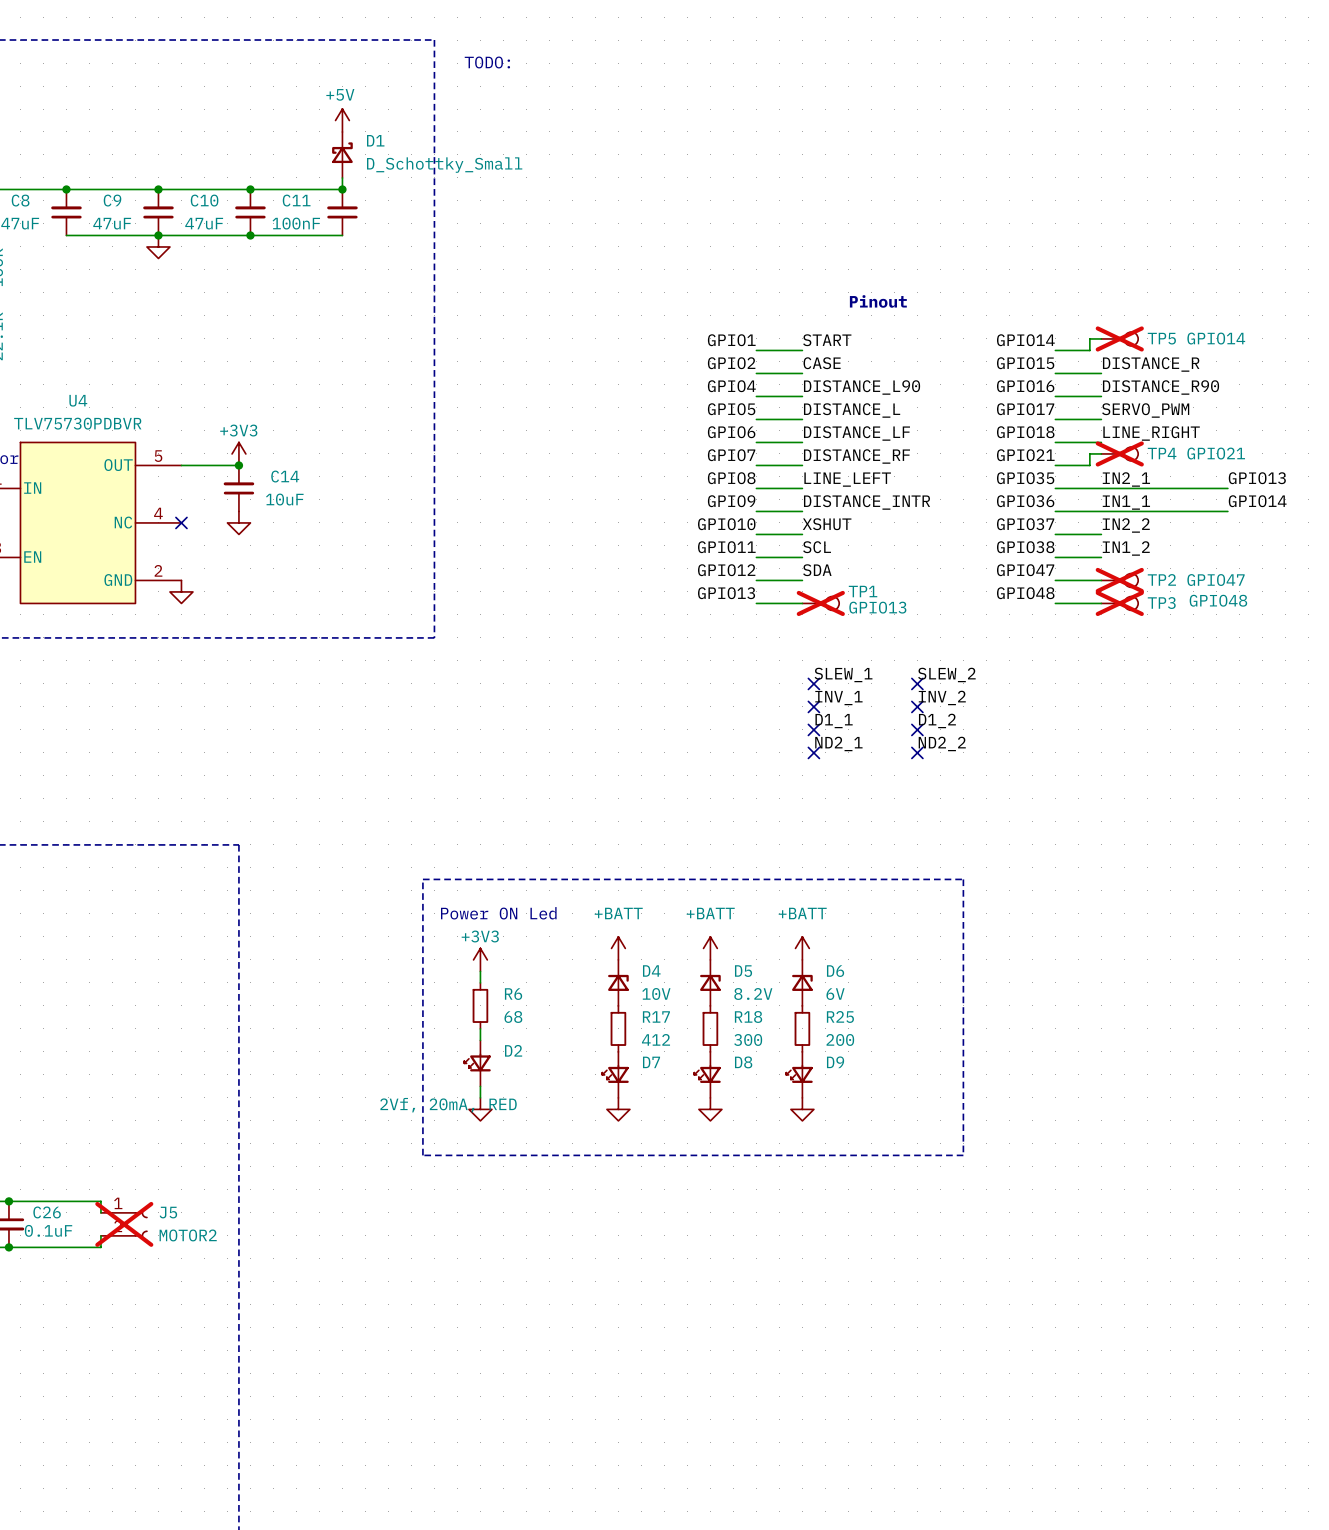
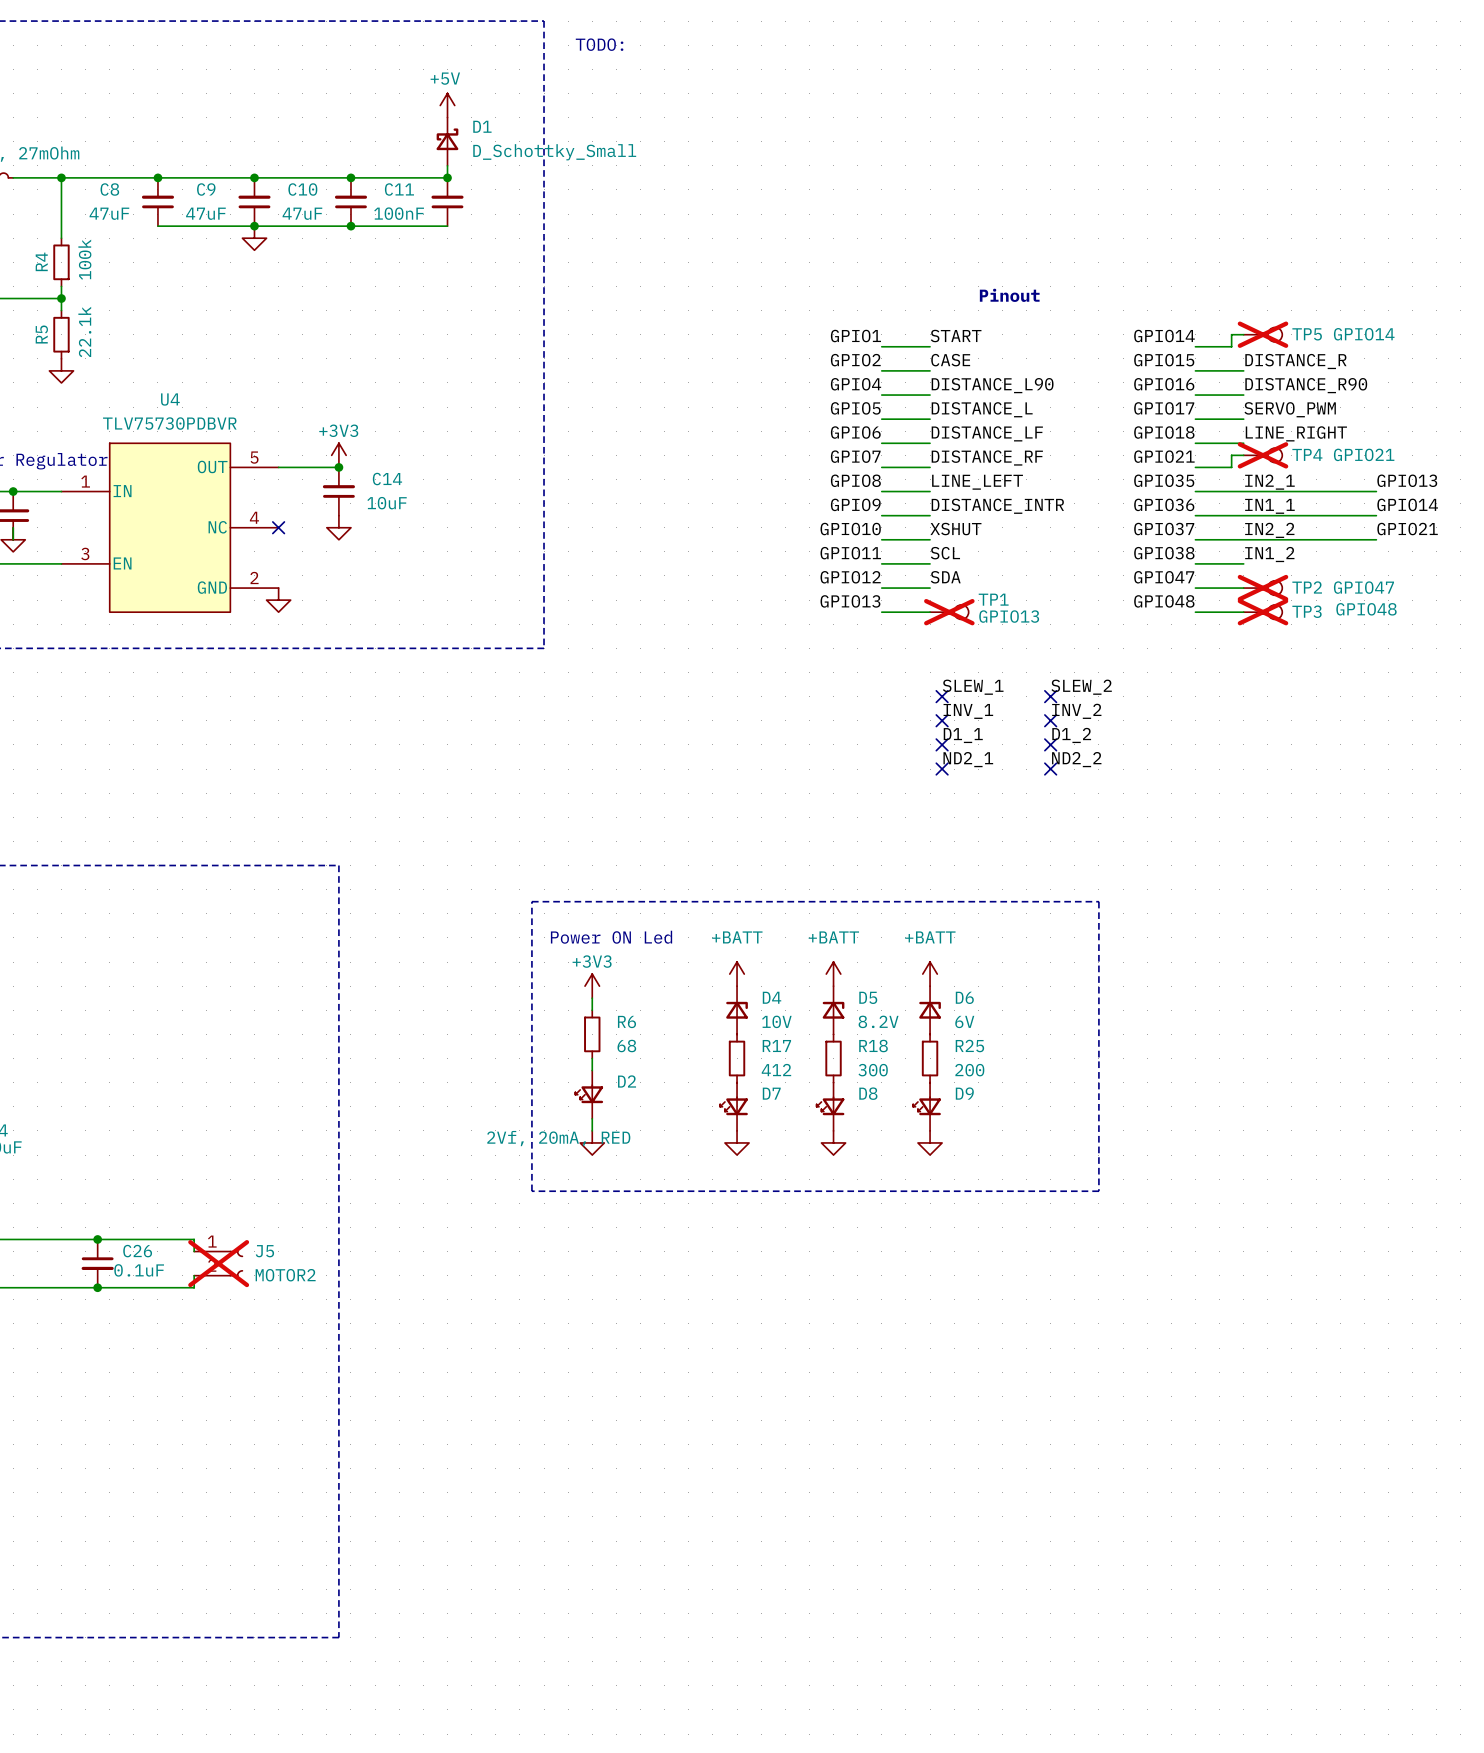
label: none -> GPIO21 (1407, 529)
wire: none -> (1243, 539) (1376, 539)

